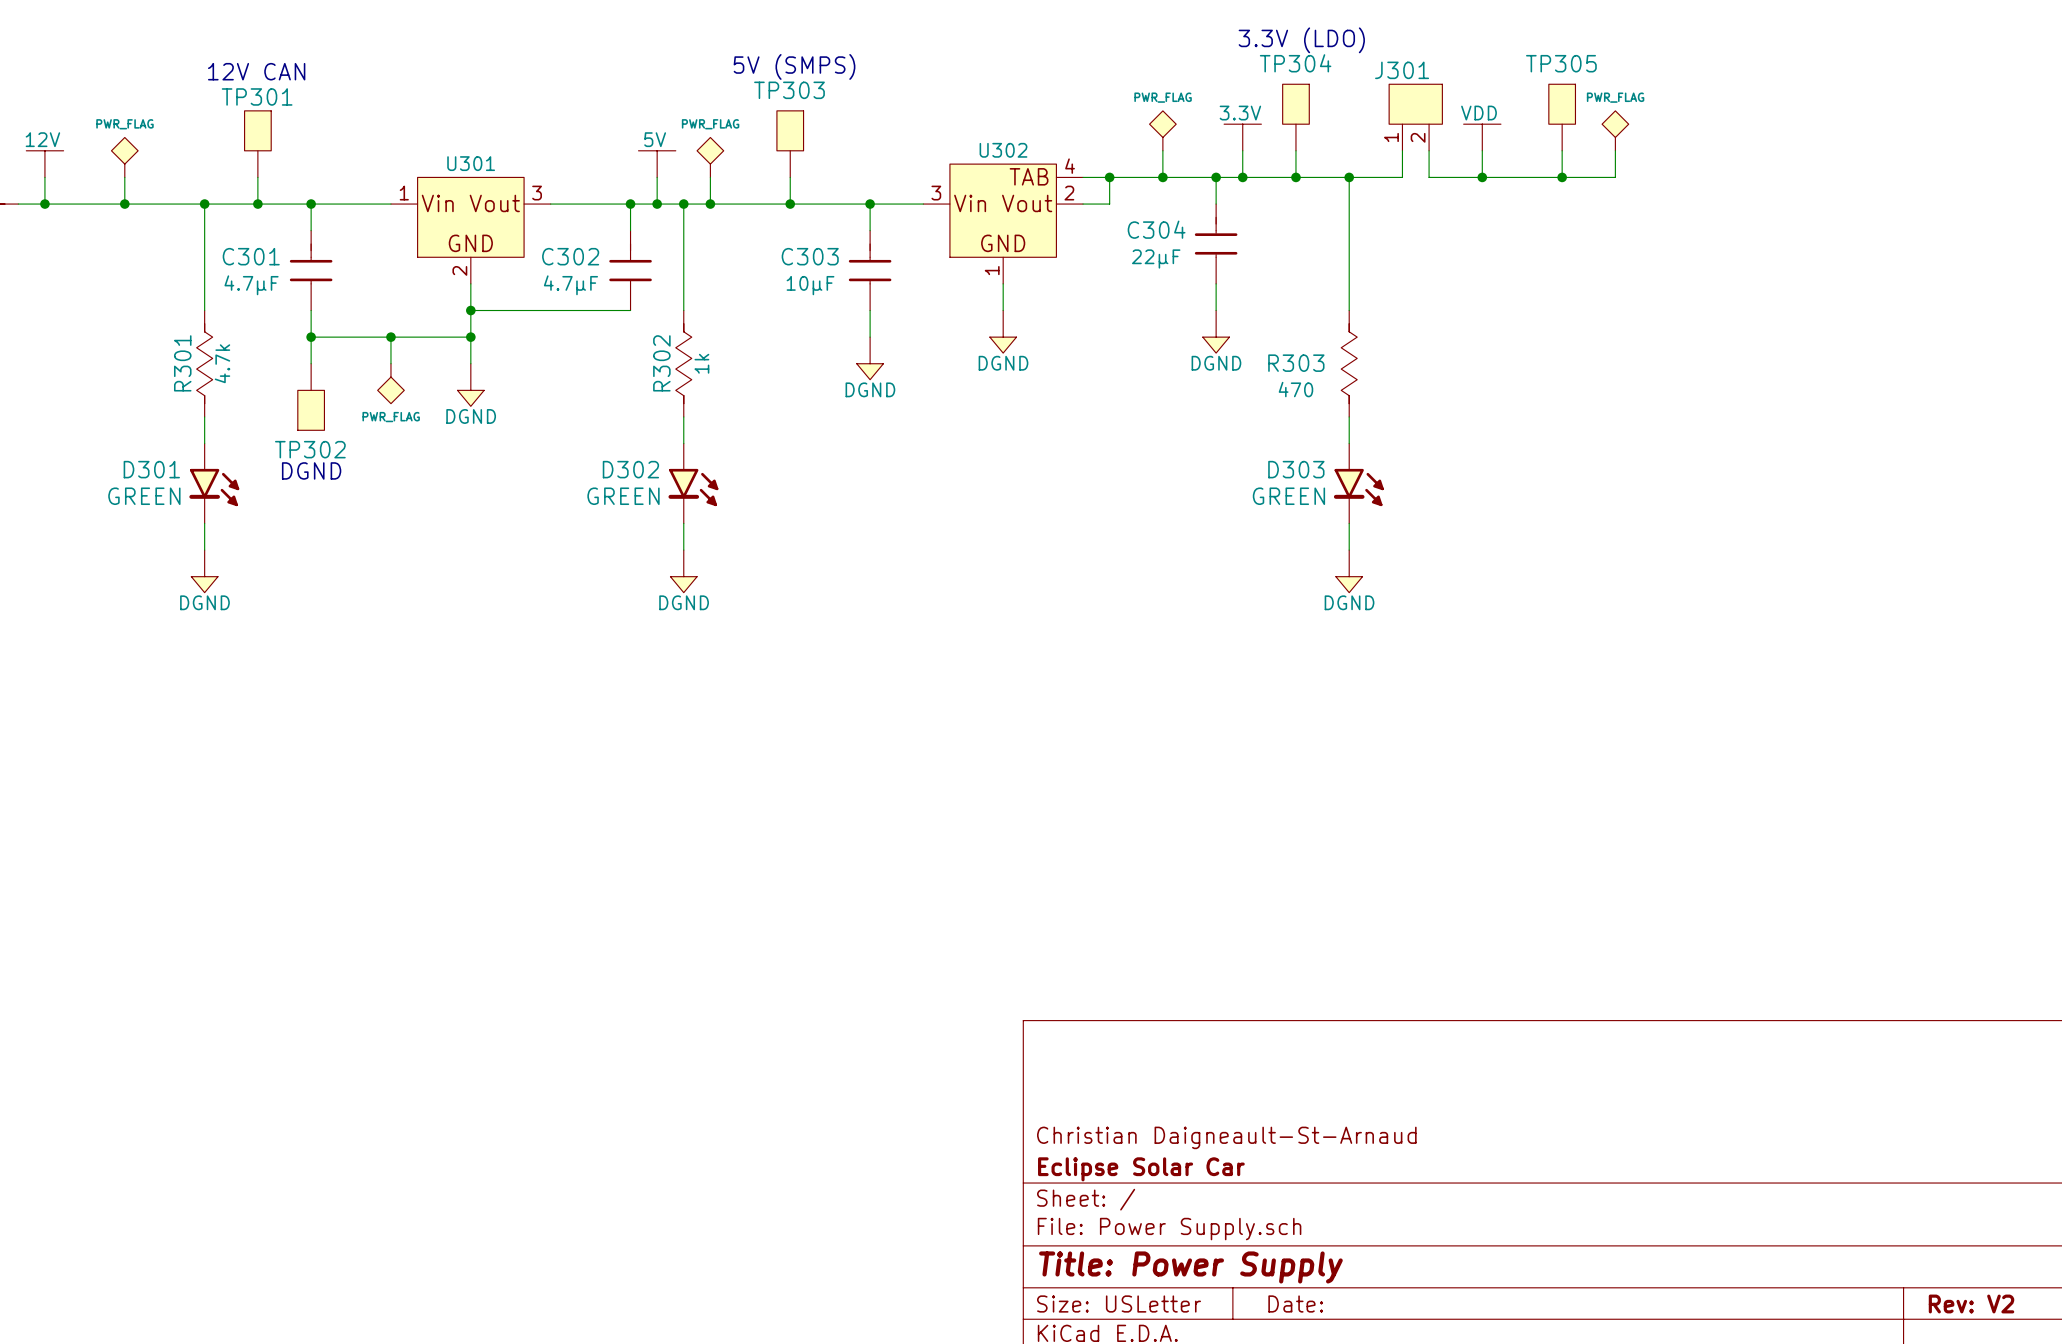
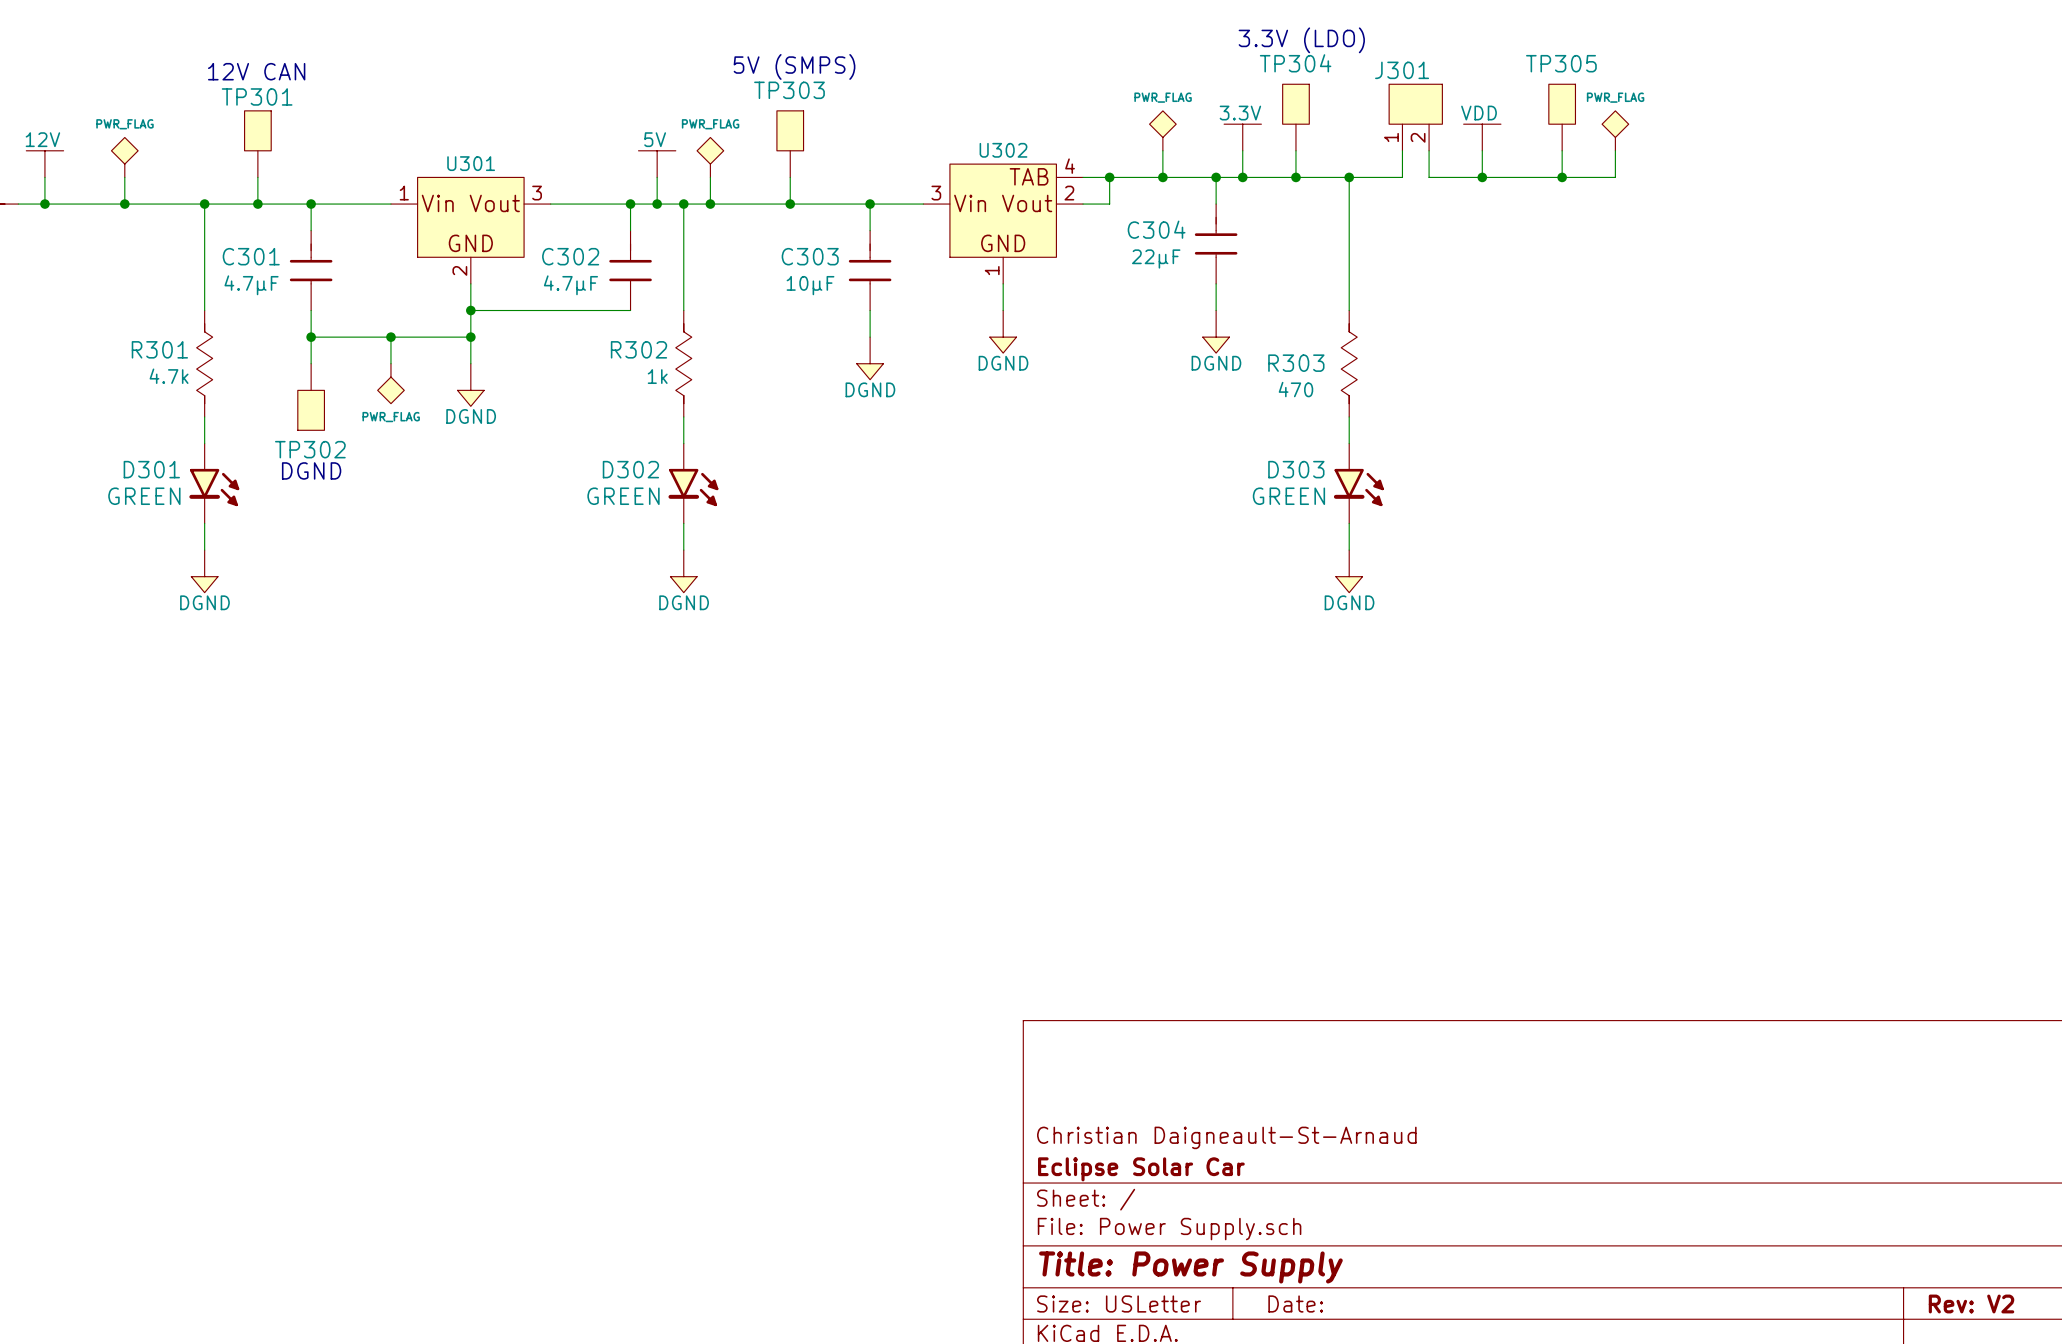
R301 name rotation: 0° (182, 363) -> 90° clockwise (159, 349)
R301 text rotation: 0° (222, 363) -> 90° clockwise (169, 376)
R301 text position: 4.7k (222, 363) -> 4.7k (169, 376)
R302 name rotation: 0° (661, 363) -> 90° clockwise (638, 349)
R302 text rotation: 0° (701, 363) -> 90° clockwise (657, 376)
R302 text position: 1k (701, 363) -> 1k (657, 376)

